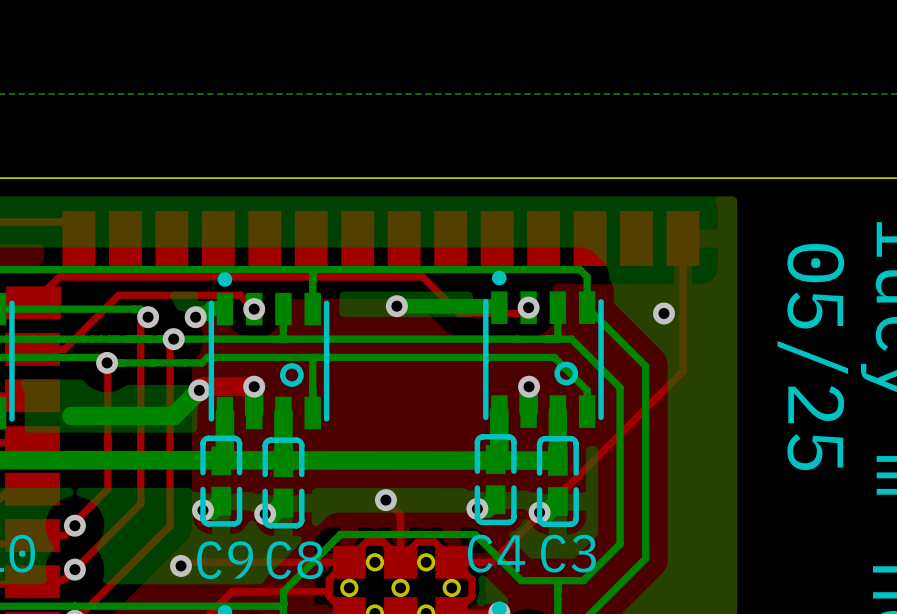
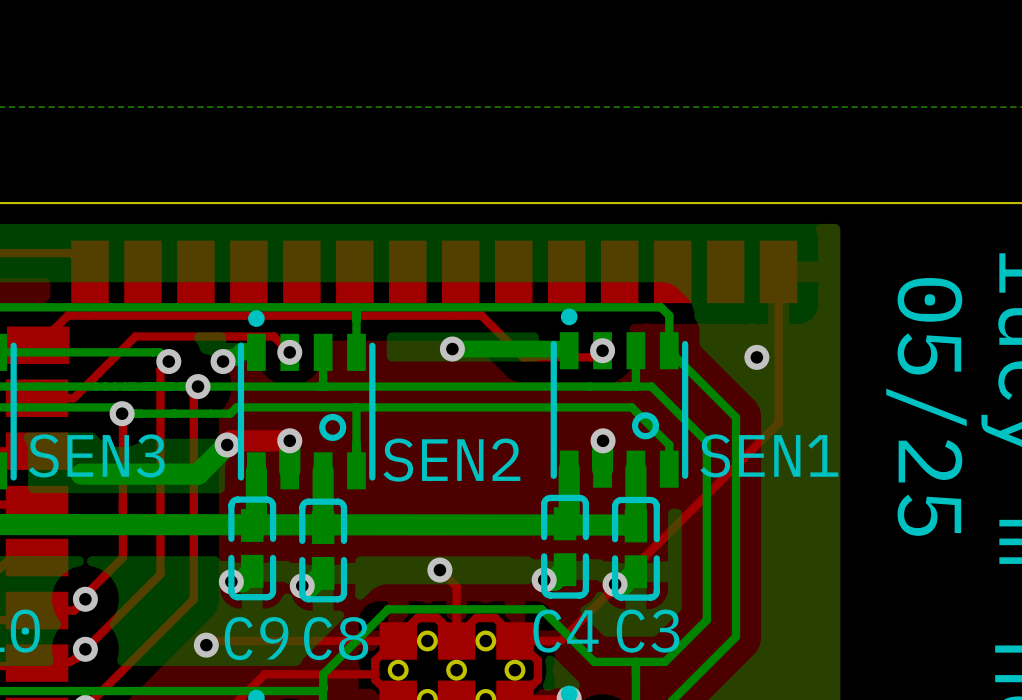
part text: none -> SEN3 (96, 455)
SEN1 name: none -> SEN1 (769, 455)
SEN2 name: none -> SEN2 (451, 460)

